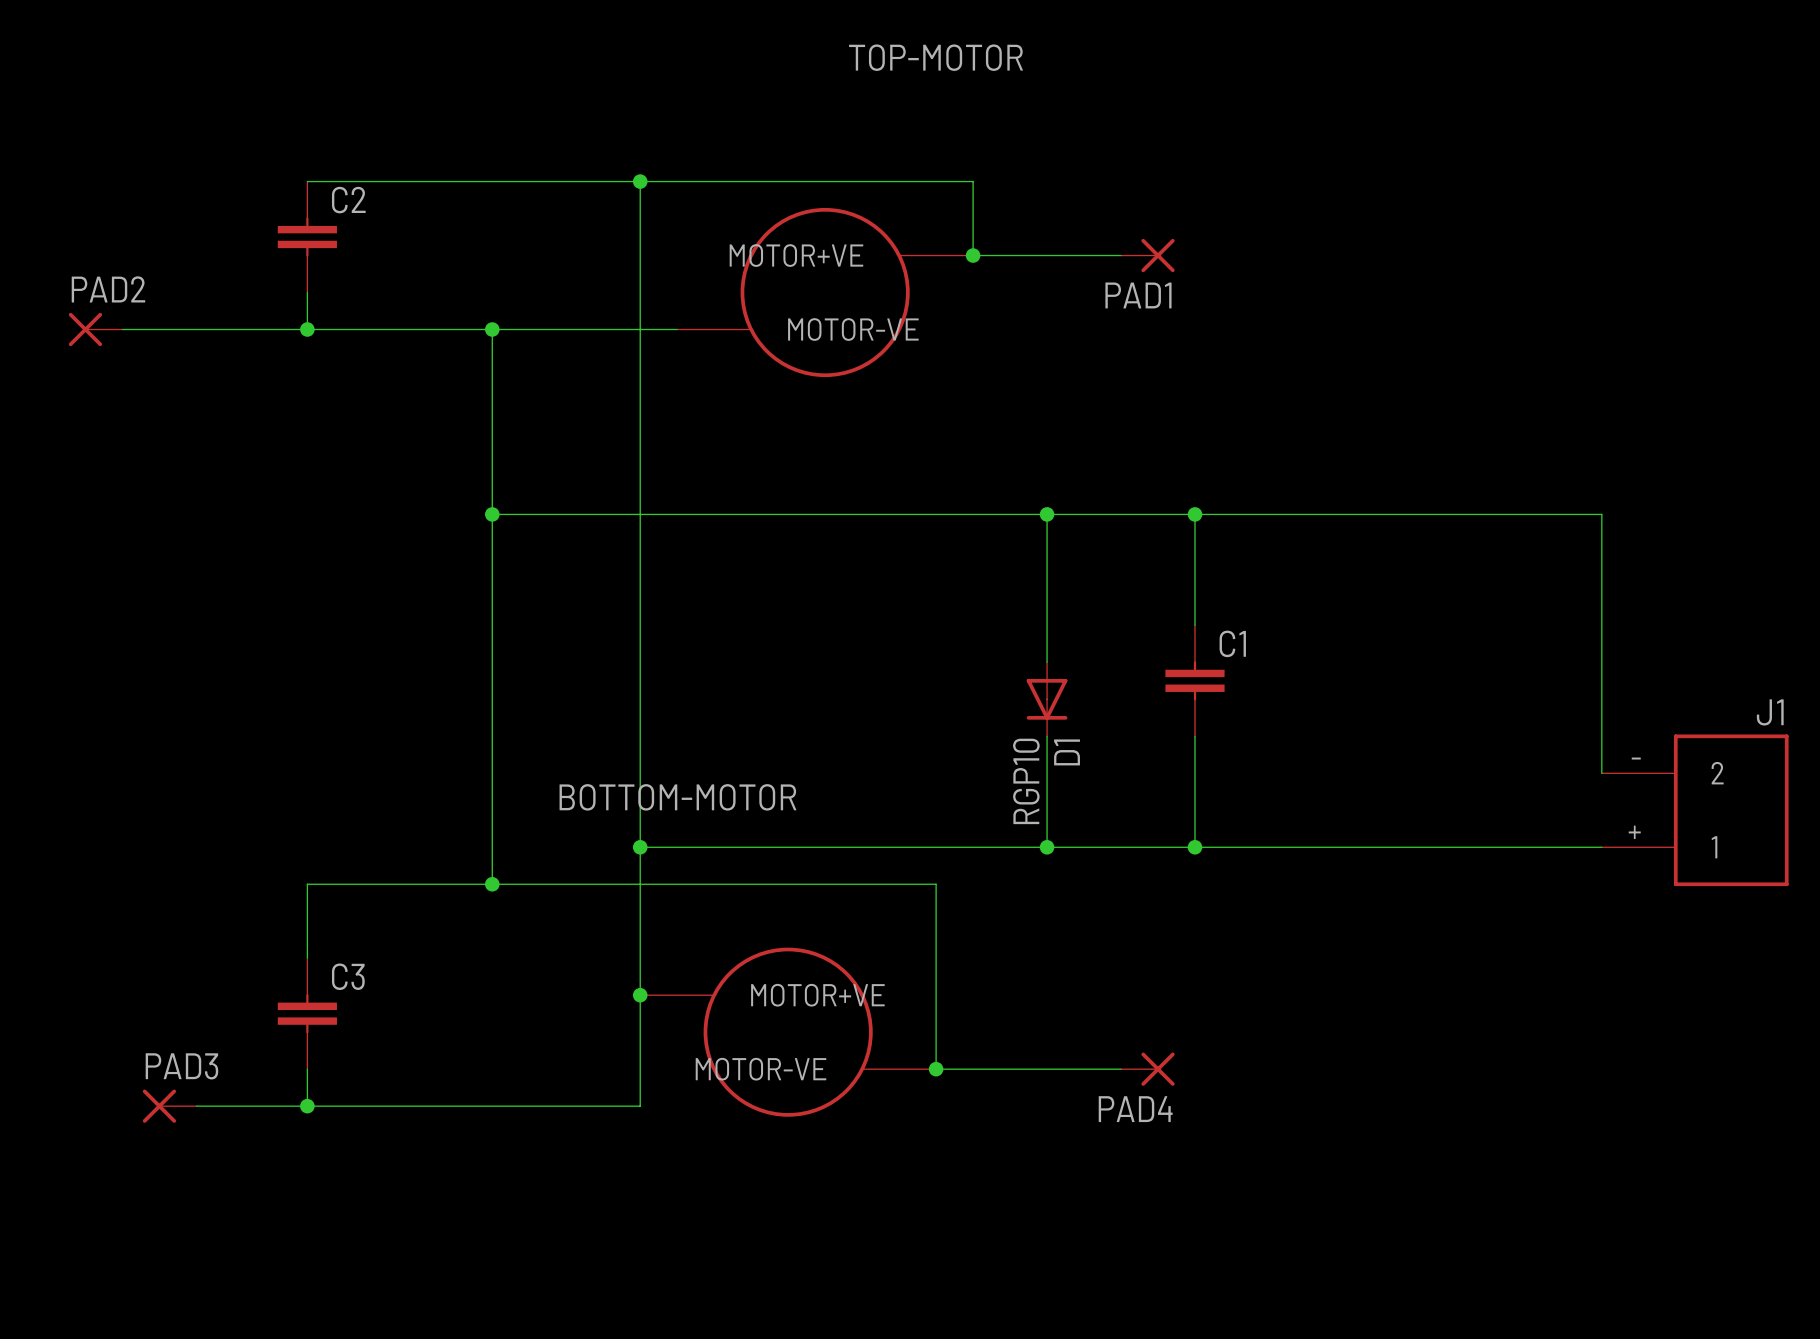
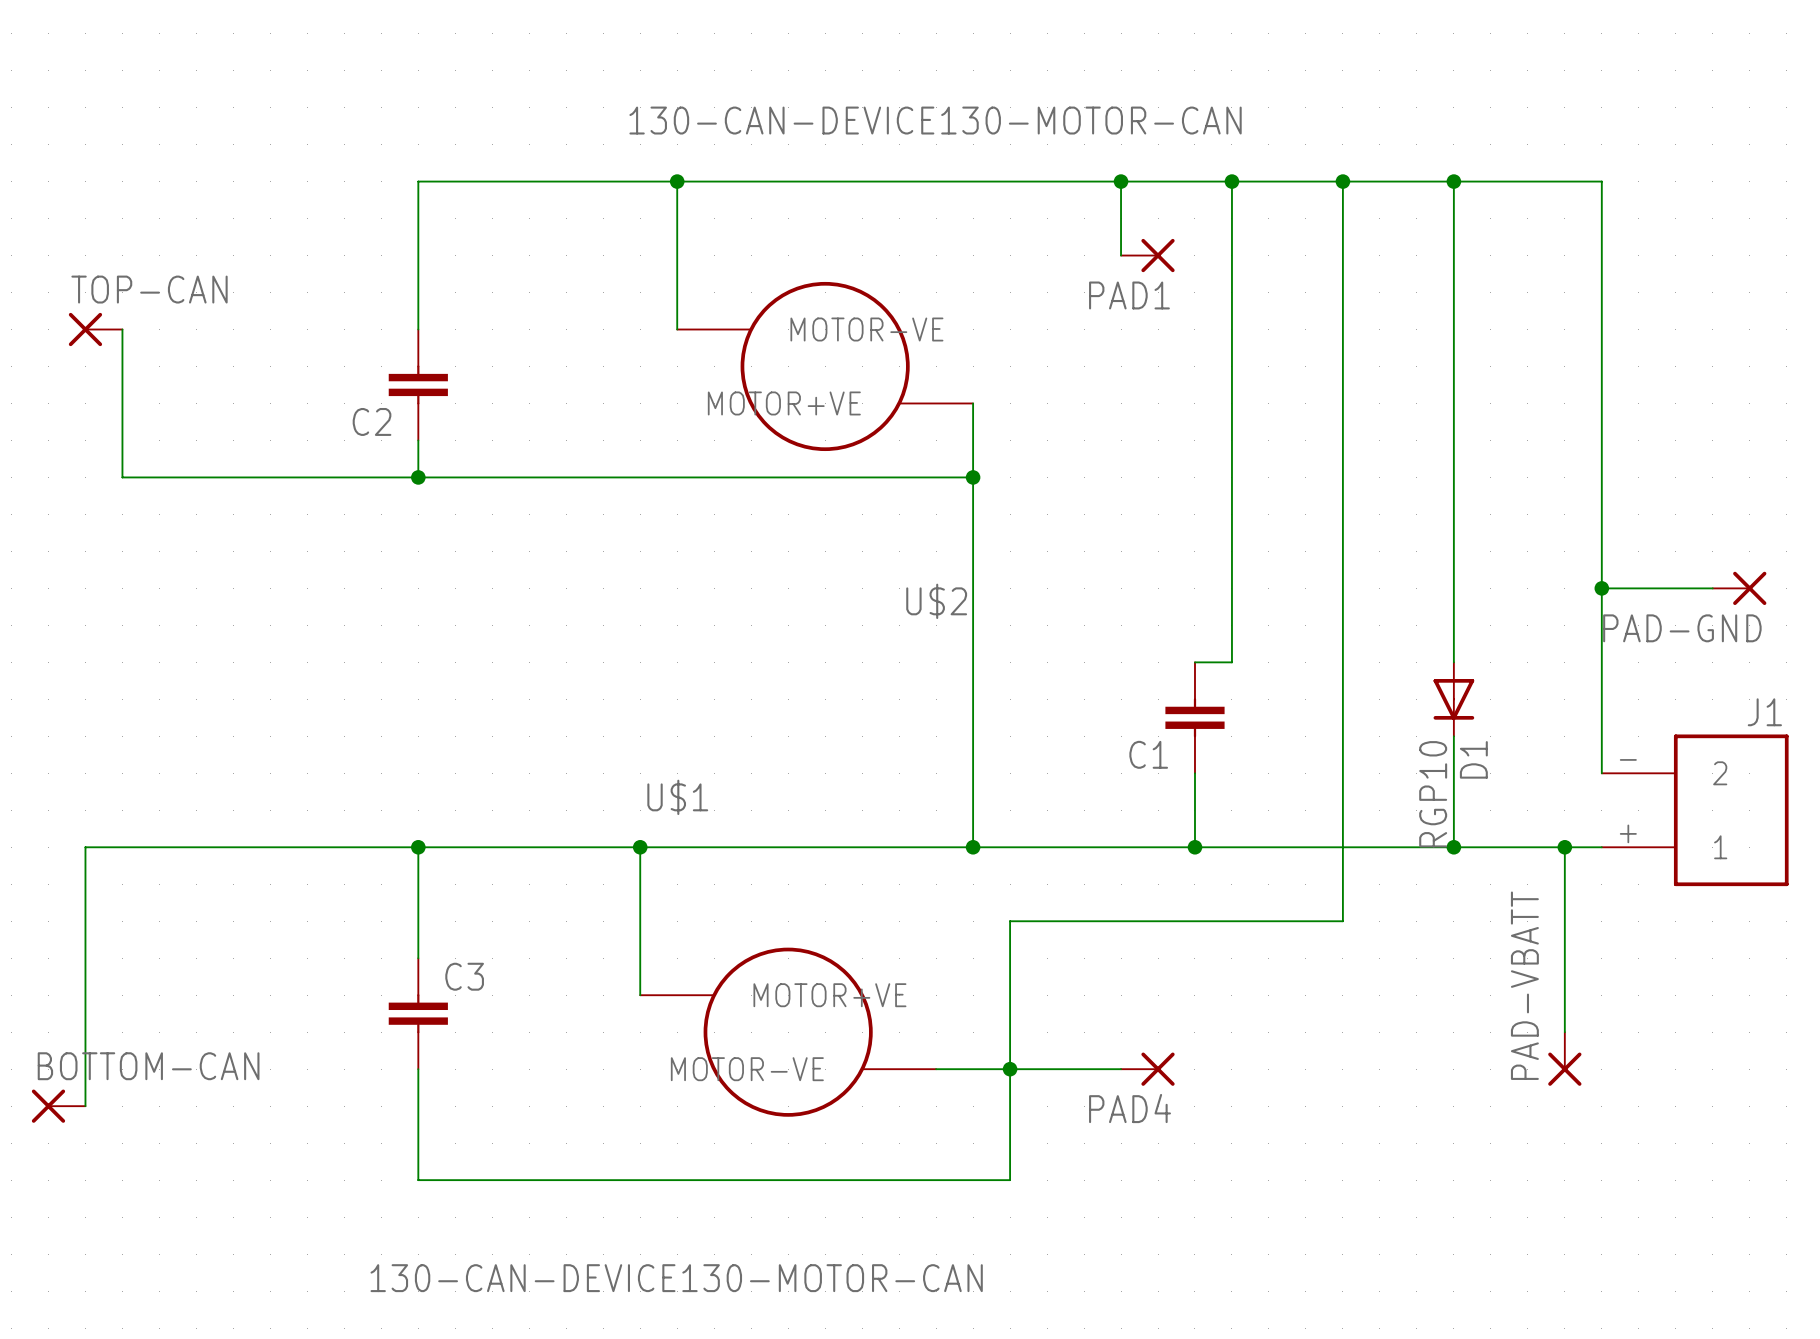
wire: (307, 181) (418, 181) -> (418, 329) (418, 181)
wire: (640, 181) (640, 847) -> (85, 1106) (85, 847) (640, 847)
junction position: (640, 181) -> (677, 181)
wire: none -> (677, 181) (677, 329)
wire: (973, 181) (973, 255) (1121, 255) -> (1121, 181) (1121, 255)
junction: none -> (1121, 181)
wire: none -> (1231, 181) (1231, 662) (1194, 662)
junction: none -> (1231, 181)
wire: none -> (1342, 181) (1342, 921) (1010, 921) (1010, 1180) (418, 1180) (418, 1069)
junction: none -> (1342, 181)
wire: none -> (1453, 181) (1453, 662)
junction: none -> (1453, 181)
C2 name position: C2 (348, 200) -> C2 (372, 421)
C2 position: (307, 237) -> (418, 384)
junction: (973, 255) -> none
PAD2 name: PAD2 (108, 289) -> TOP-CAN (149, 289)
wire: (307, 292) (307, 329) -> (418, 440) (418, 477)
TOP-MOTOR: (825, 292) -> none
wire: (122, 329) (677, 329) -> (122, 329) (122, 477) (973, 477)
junction: (307, 329) -> none
wire: (492, 329) (492, 884) -> none
junction: (492, 329) -> none
U$2: none -> 130-CAN-DEVICE130-MOTOR-CAN (825, 366)
wire: none -> (973, 403) (973, 847)
junction: none -> (418, 477)
wire: (492, 514) (1601, 514) -> (973, 181) (1601, 181) (1601, 514)
junction: (492, 514) -> none
wire: (1047, 514) (1047, 662) -> none
junction position: (1047, 514) -> (973, 477)
wire: (1194, 514) (1194, 625) -> (1453, 736) (1453, 847)
junction: (1194, 514) -> none
wire: none -> (1601, 588) (1712, 588)
junction: none -> (1601, 588)
PAD-GND: none -> (1739, 588)
C1 name position: C1 (1232, 643) -> C1 (1148, 754)
C1 position: (1194, 680) -> (1194, 717)
D1 position: (1047, 699) -> (1453, 699)
wire: (1047, 736) (1047, 847) -> none
BOTTOM-MOTOR name: BOTTOM-MOTOR (677, 797) -> U$1 (677, 797)
wire: none -> (418, 847) (418, 958)
junction position: (1047, 847) -> (973, 847)
junction: none -> (1453, 847)
wire: none -> (1564, 847) (1564, 1032)
junction: none -> (1564, 847)
junction position: (492, 884) -> (418, 847)
wire: (307, 958) (307, 884) (936, 884) (936, 1069) -> none
wire: (640, 995) (640, 1106) (196, 1106) -> none
junction: (640, 995) -> none
C3 position: (307, 1013) -> (418, 1013)
PAD-VBATT: none -> (1564, 1059)
wire: (307, 1069) (307, 1106) -> none
junction position: (936, 1069) -> (1010, 1069)
BOTTOM-CAN: none -> (58, 1106)
PAD3: (169, 1106) -> none
junction: (307, 1106) -> none
BOTTOM-MOTOR value: none -> 130-CAN-DEVICE130-MOTOR-CAN (676, 1278)

